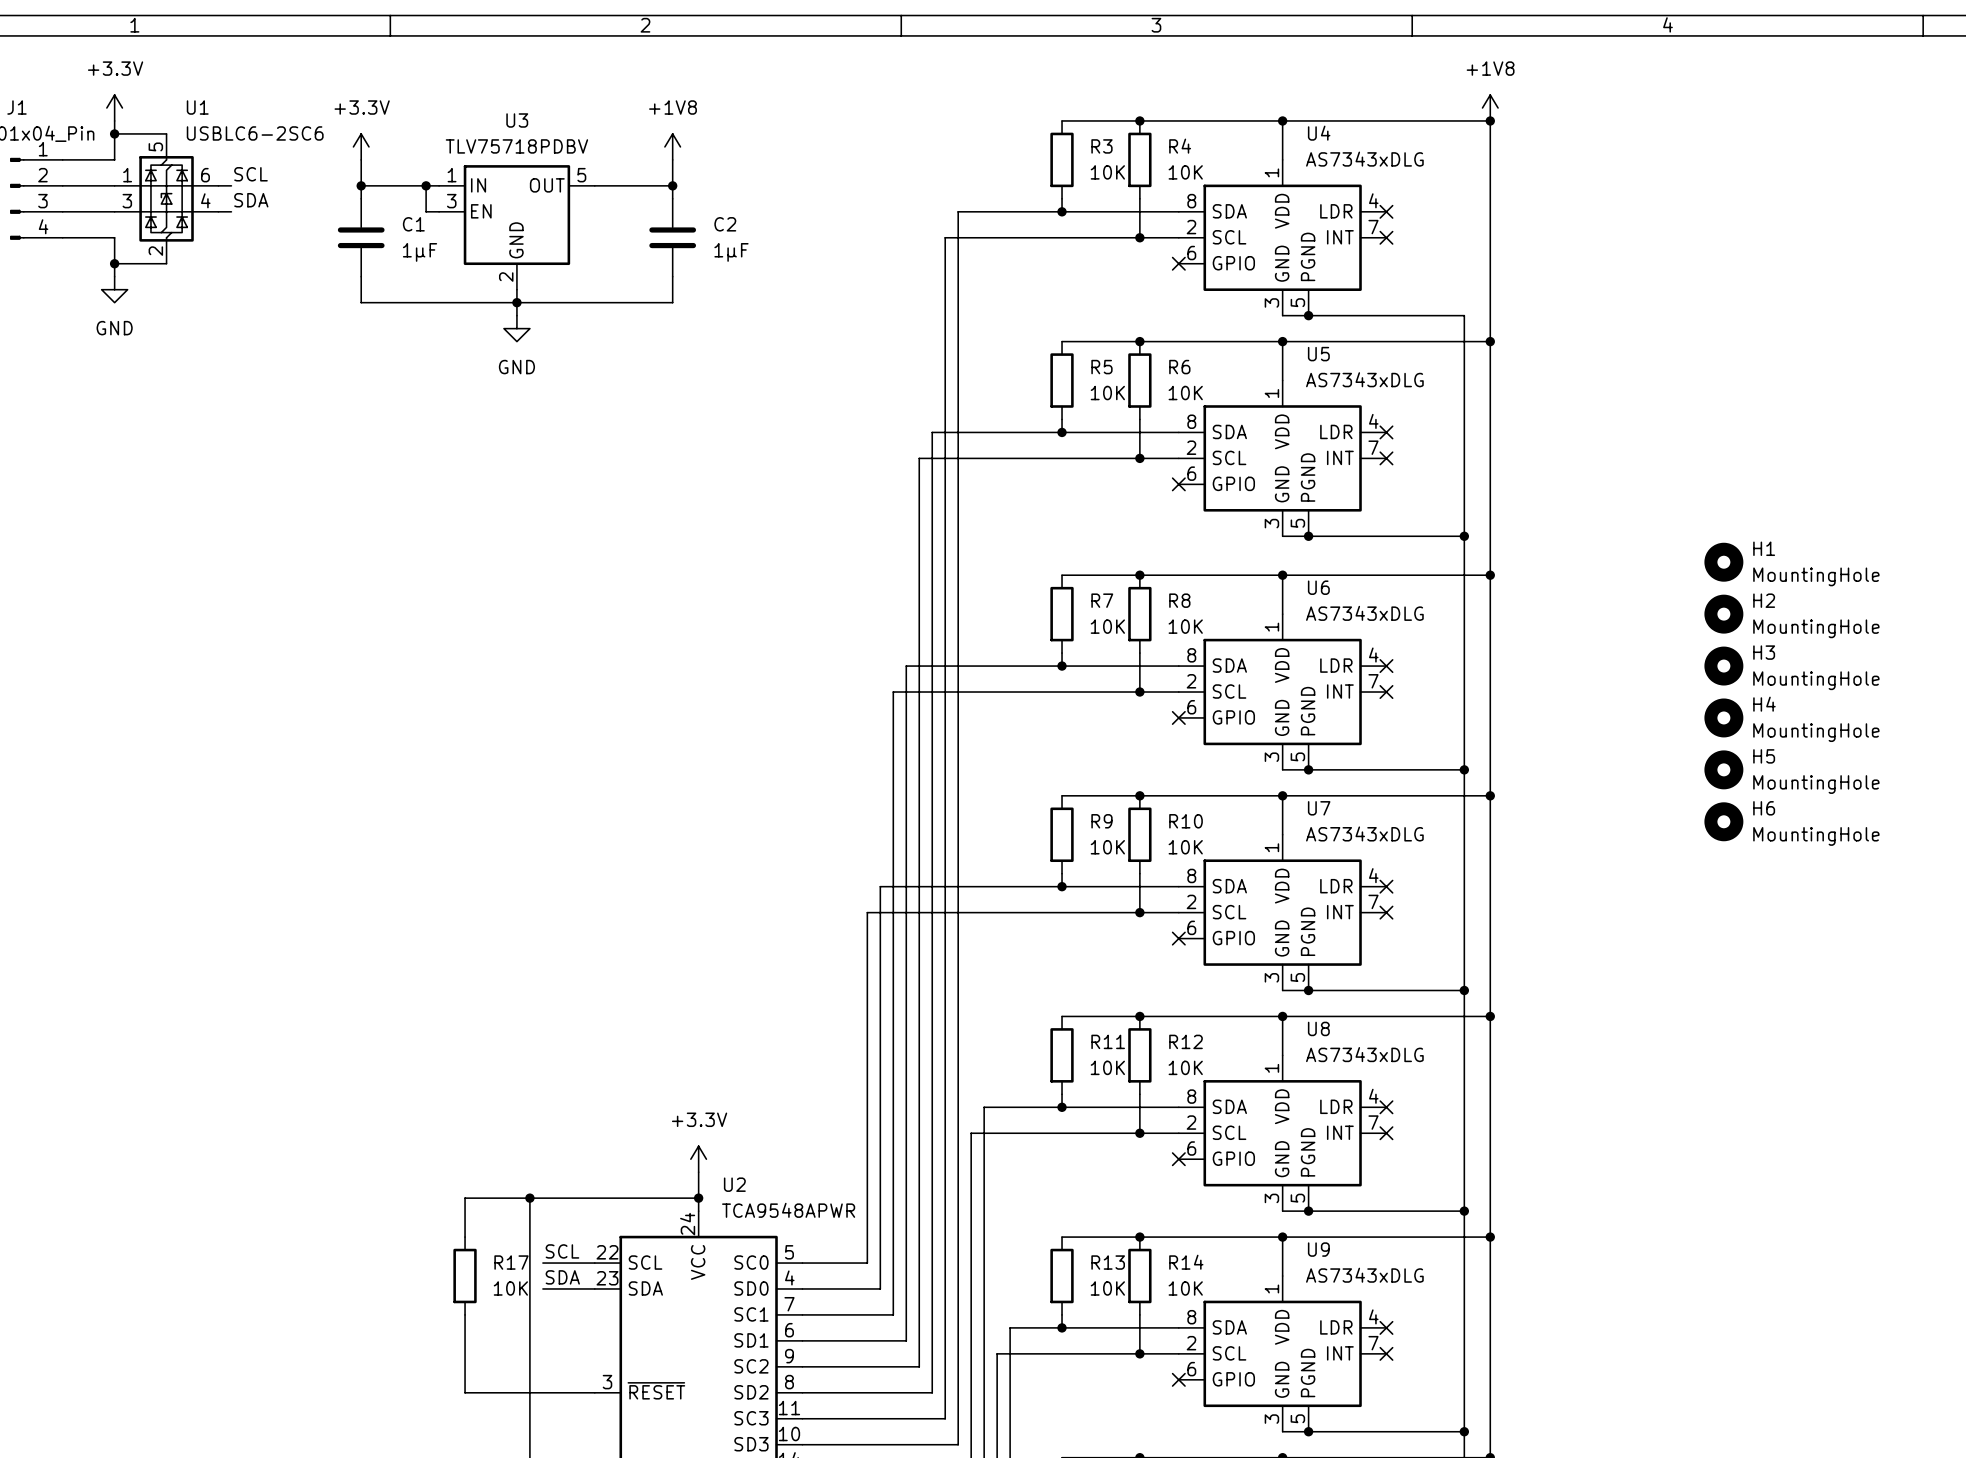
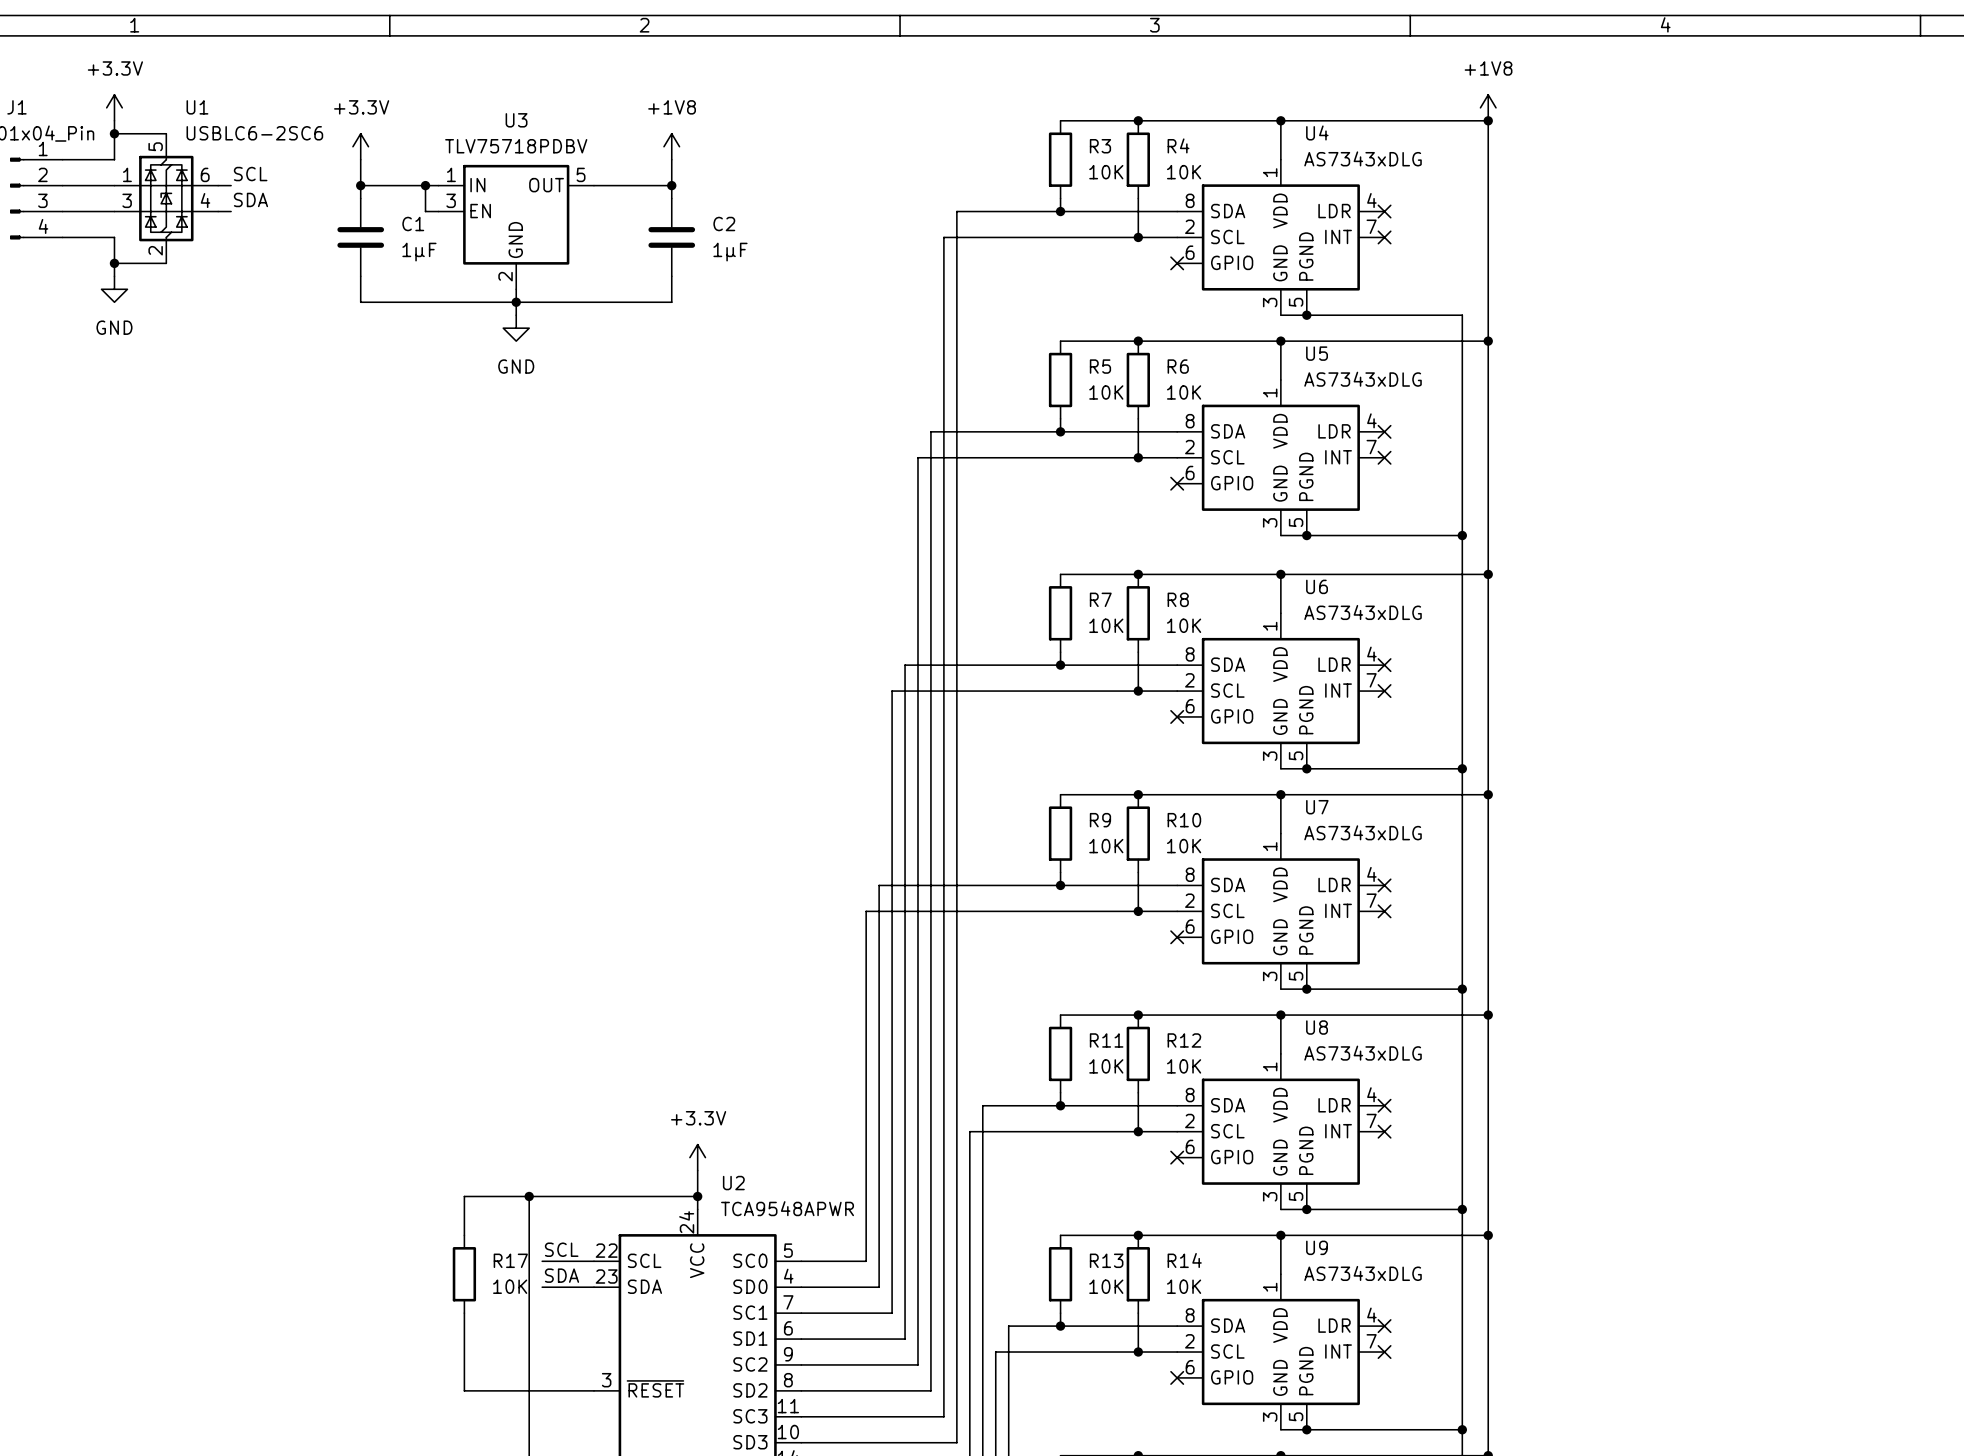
H1: MountingHole (1723, 562) -> none
H2: MountingHole (1723, 614) -> none
H3: MountingHole (1723, 666) -> none
H4: MountingHole (1723, 717) -> none
H5: MountingHole (1723, 769) -> none
H6: MountingHole (1723, 821) -> none

